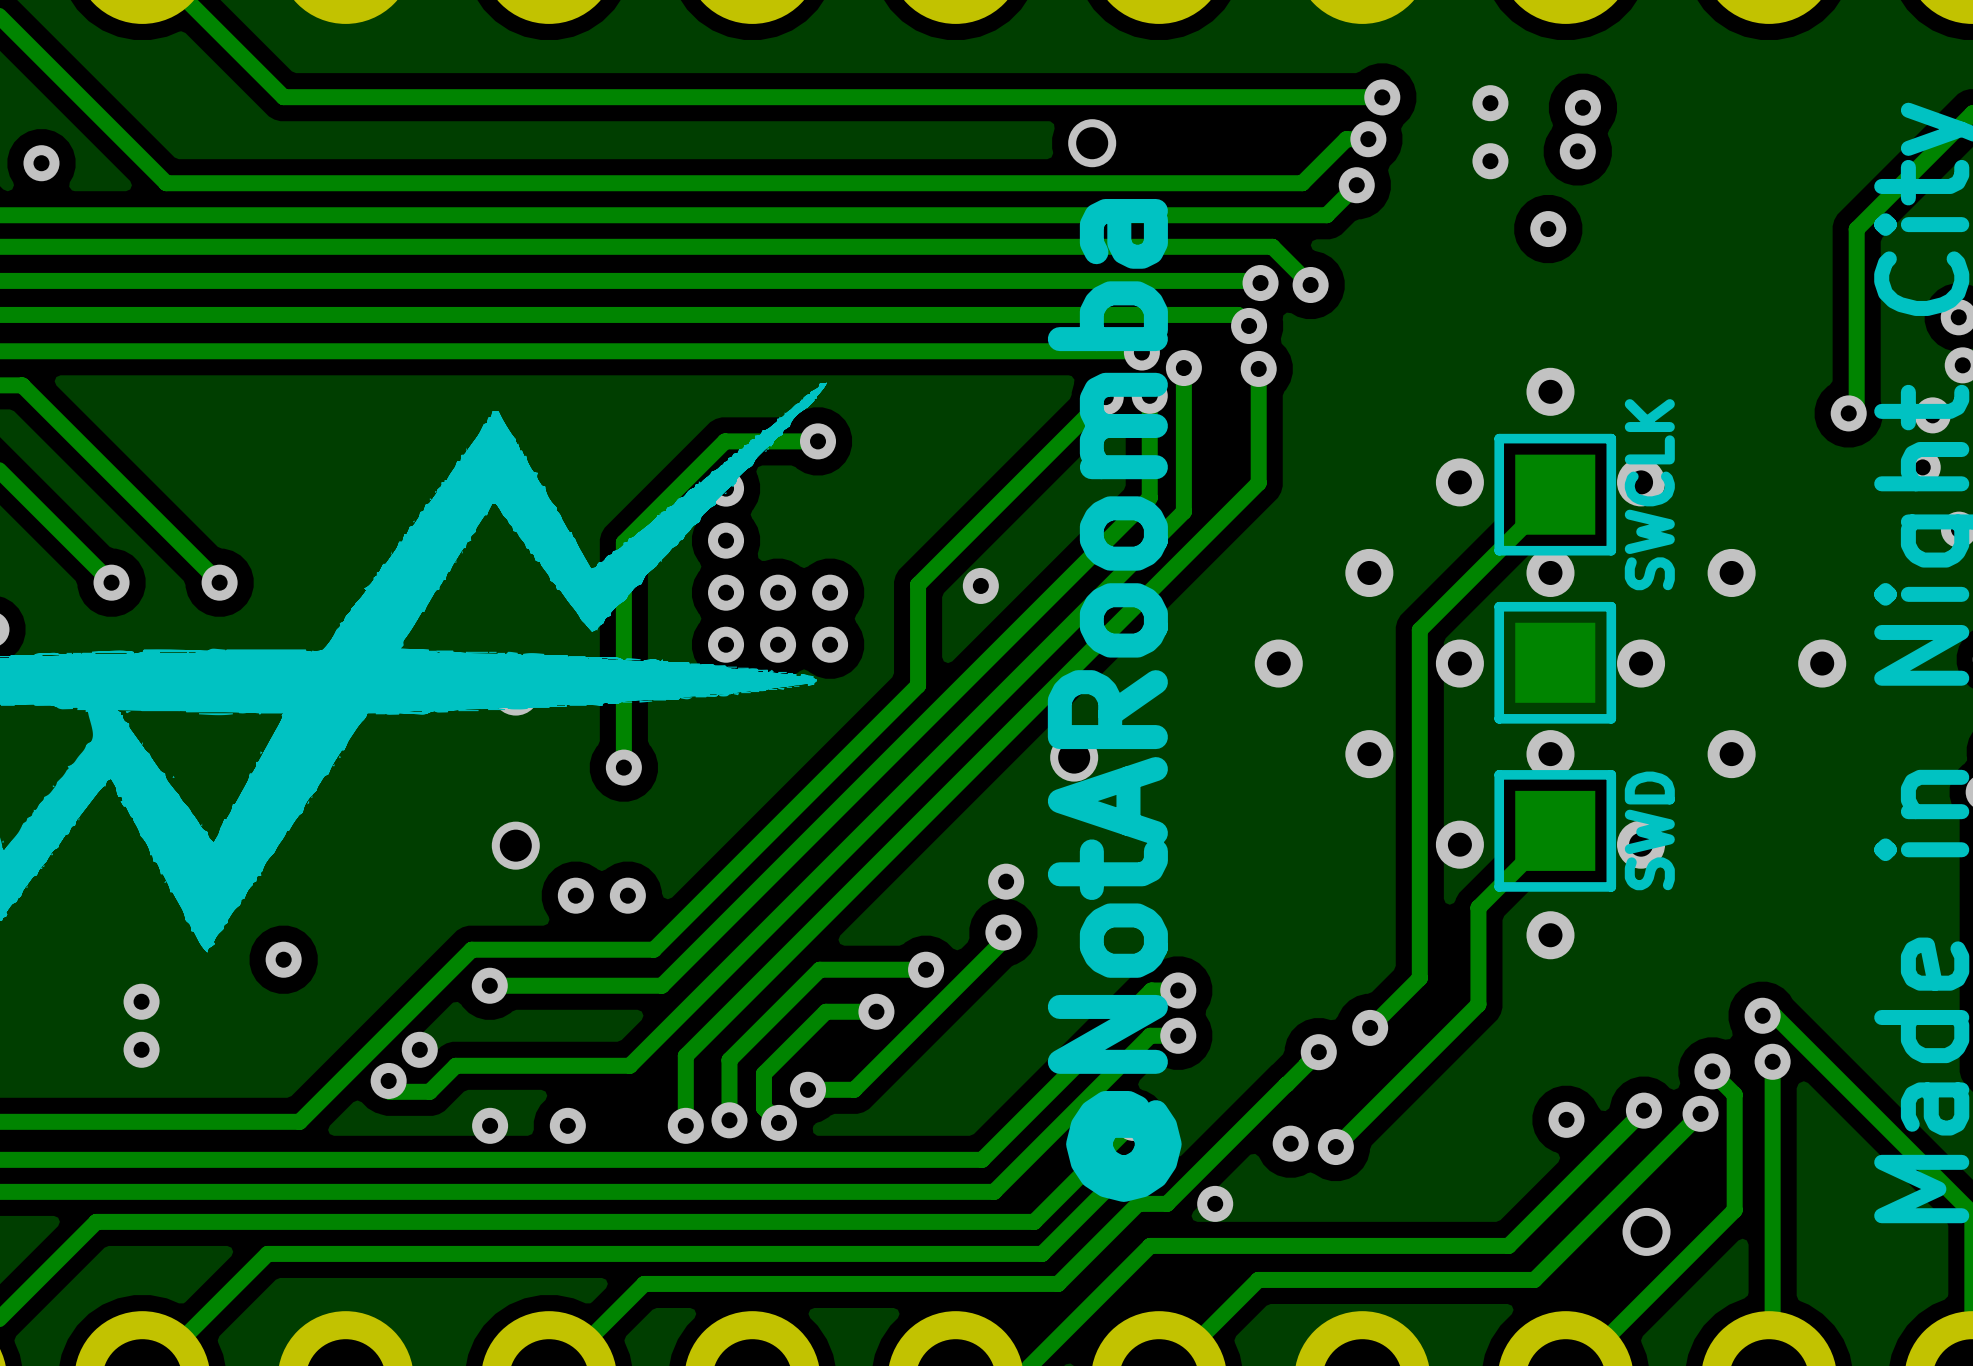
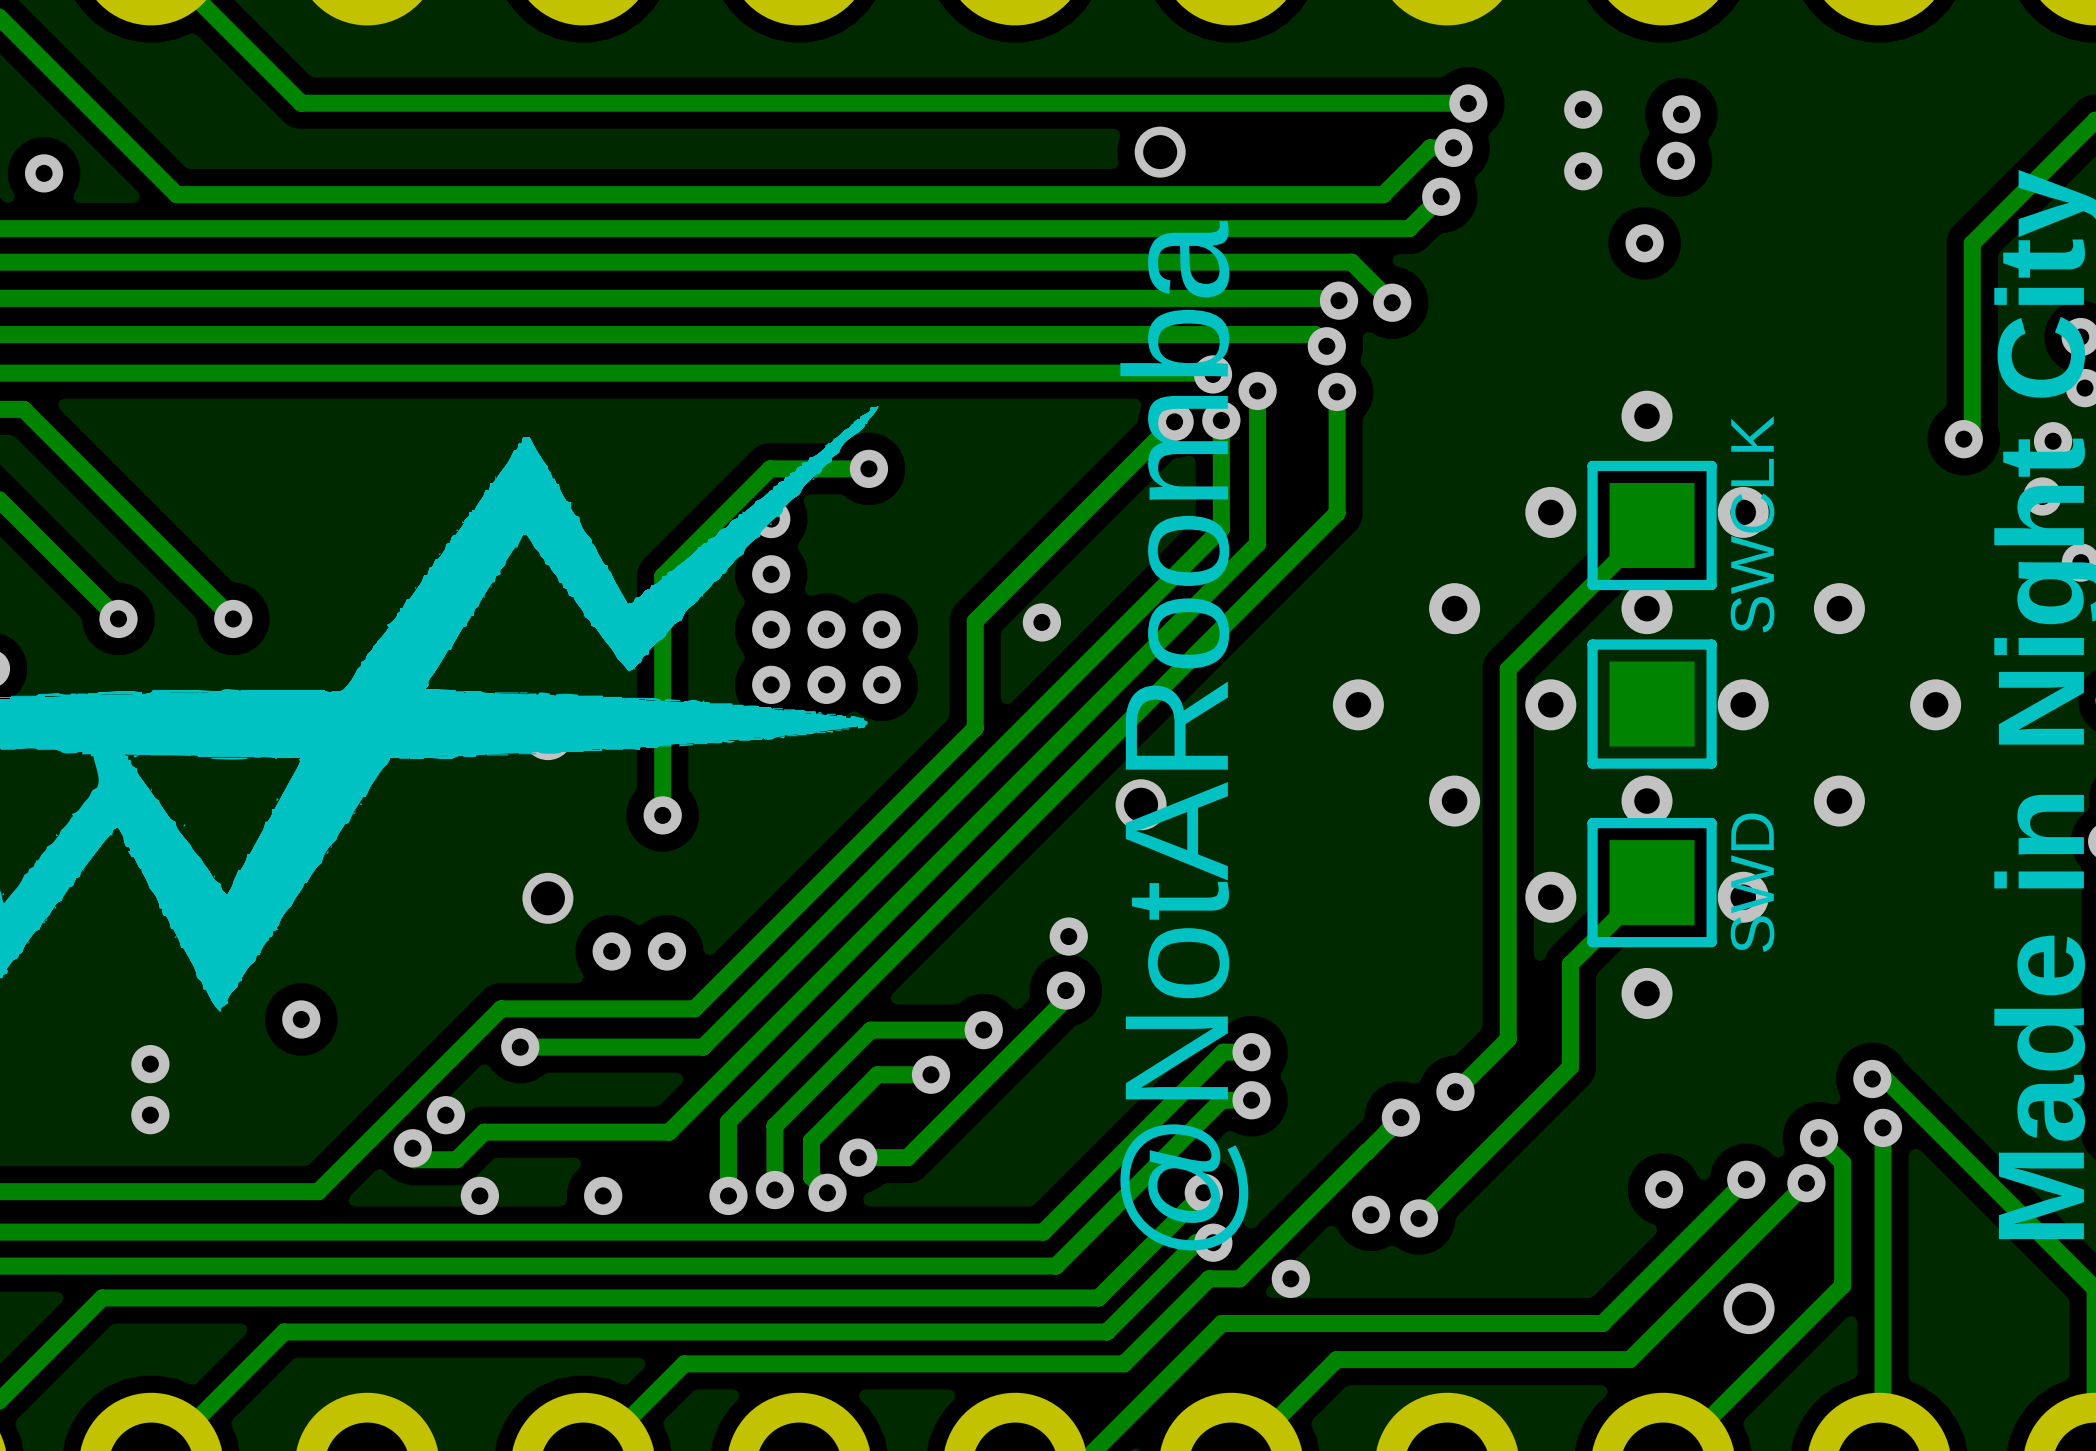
via position: (490, 1125) -> (479, 1195)

